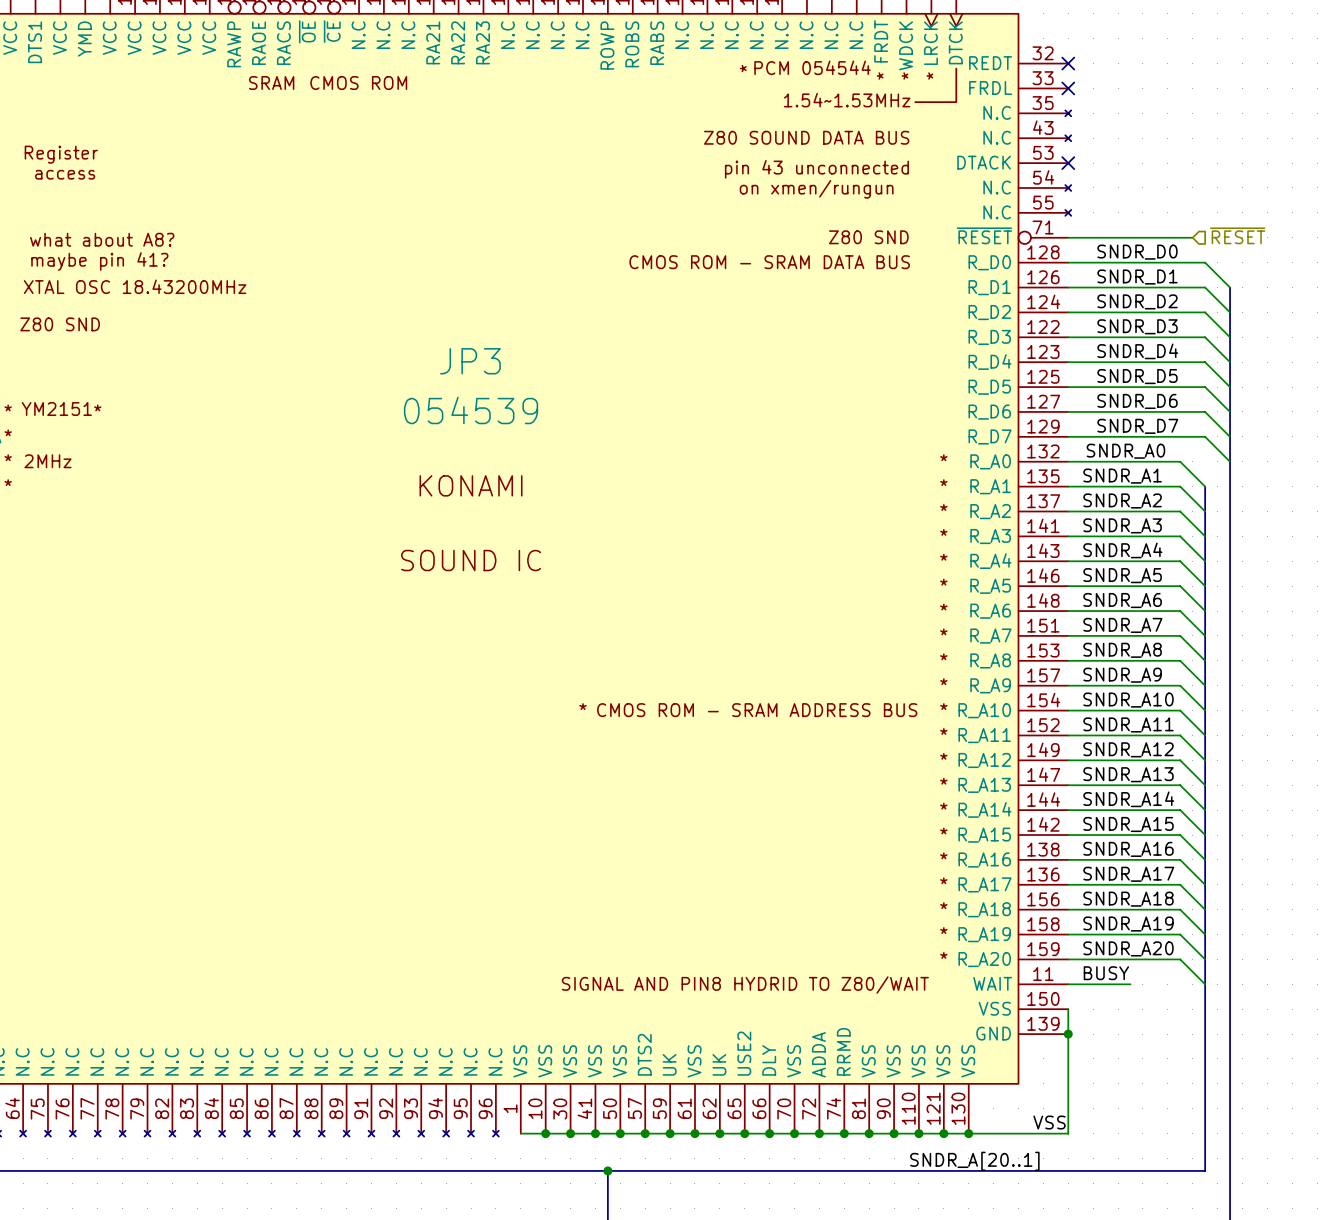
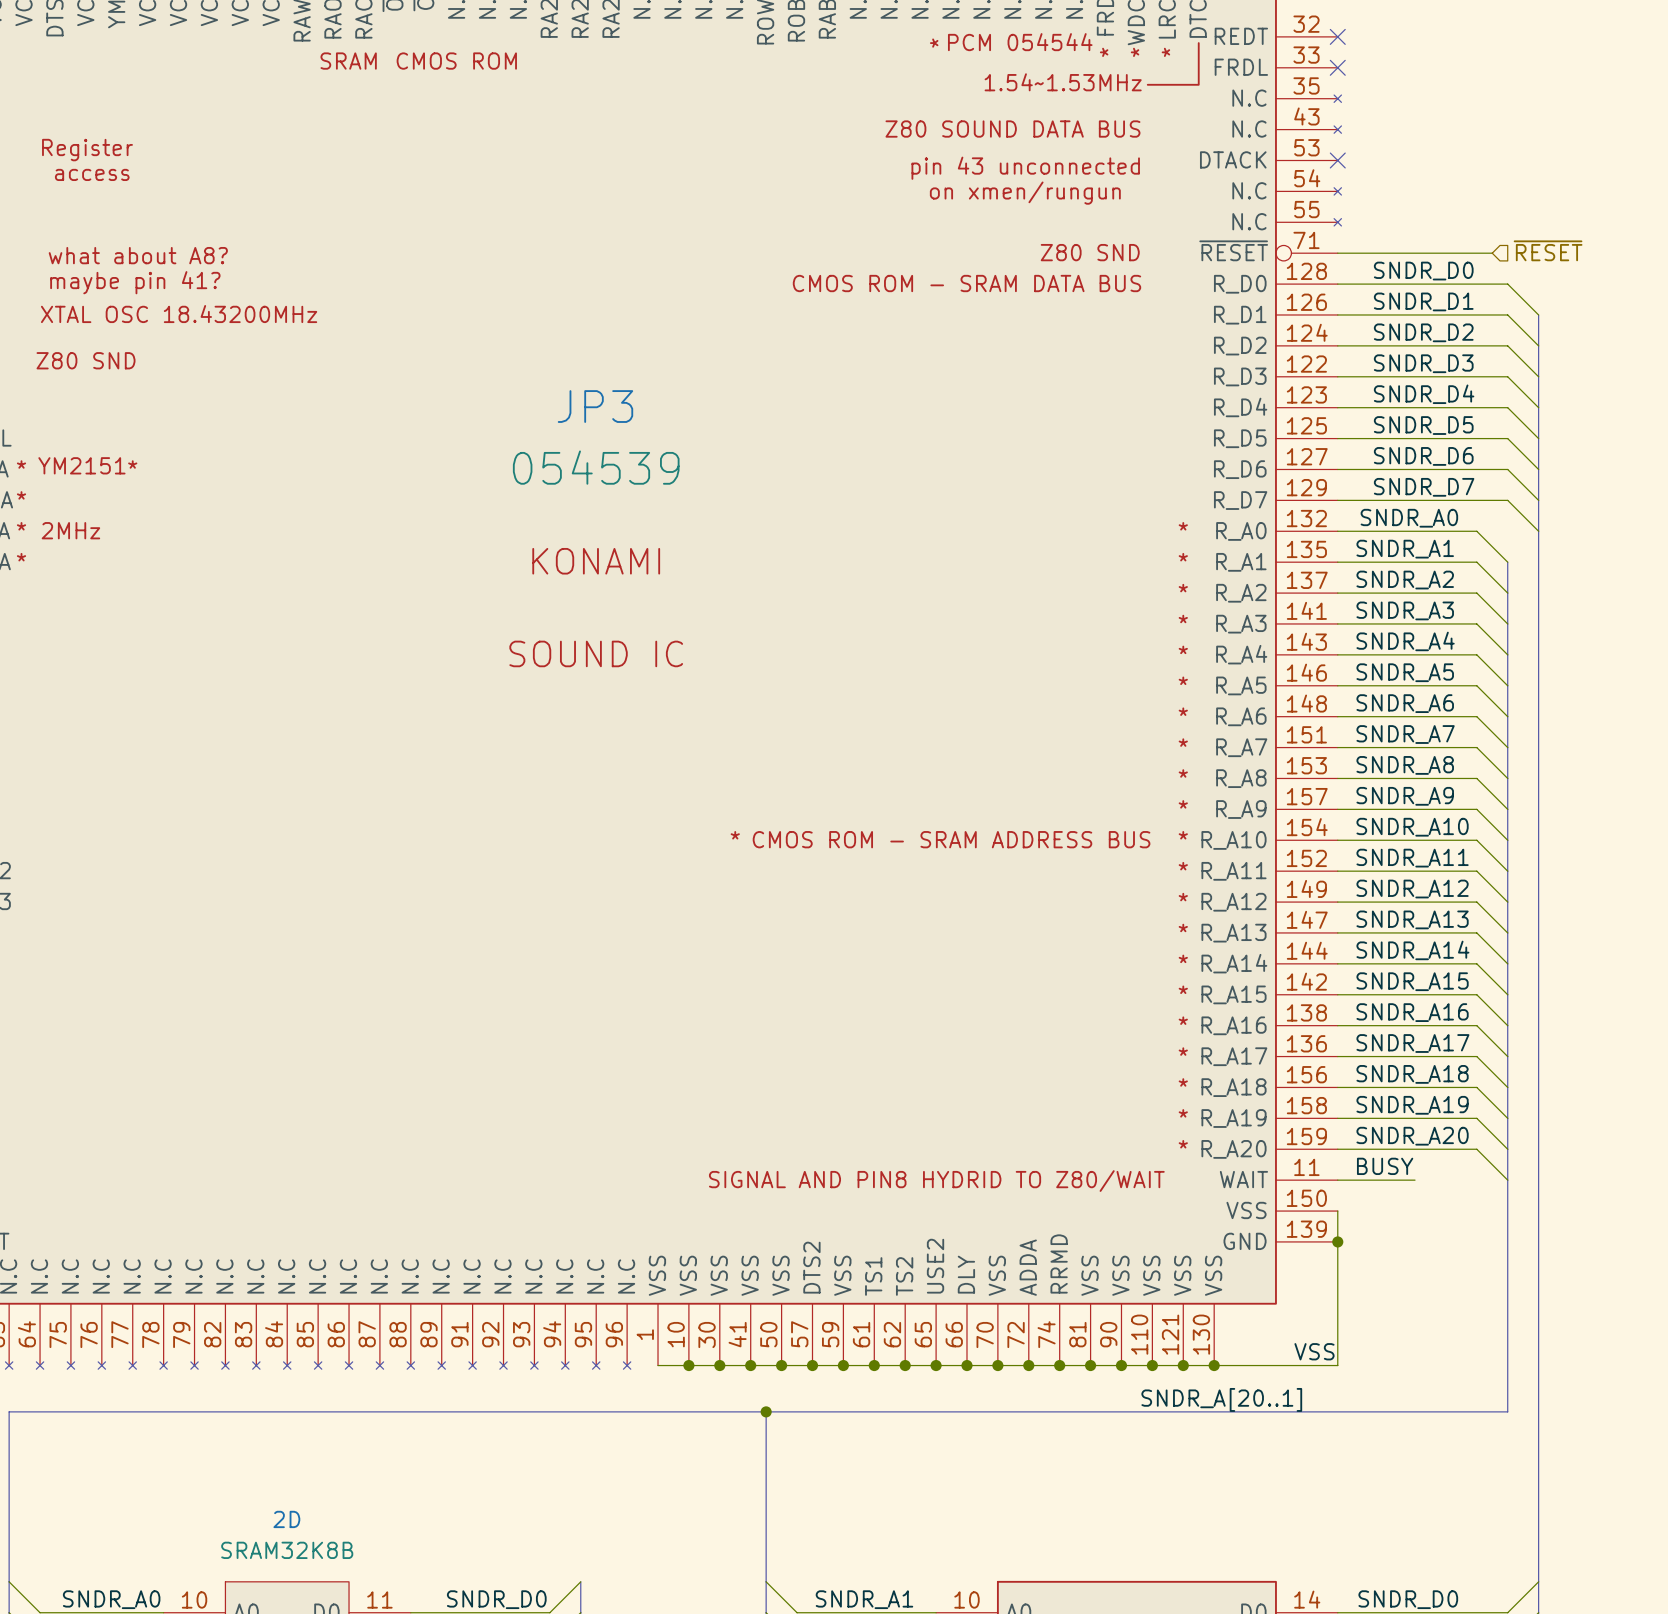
JP3 pin name: VSS (694, 1061) -> TS1 (873, 1276)
JP3 pin name: UK (669, 1064) -> VSS (842, 1275)
JP3 pin name: UK (719, 1064) -> TS2 (904, 1276)

